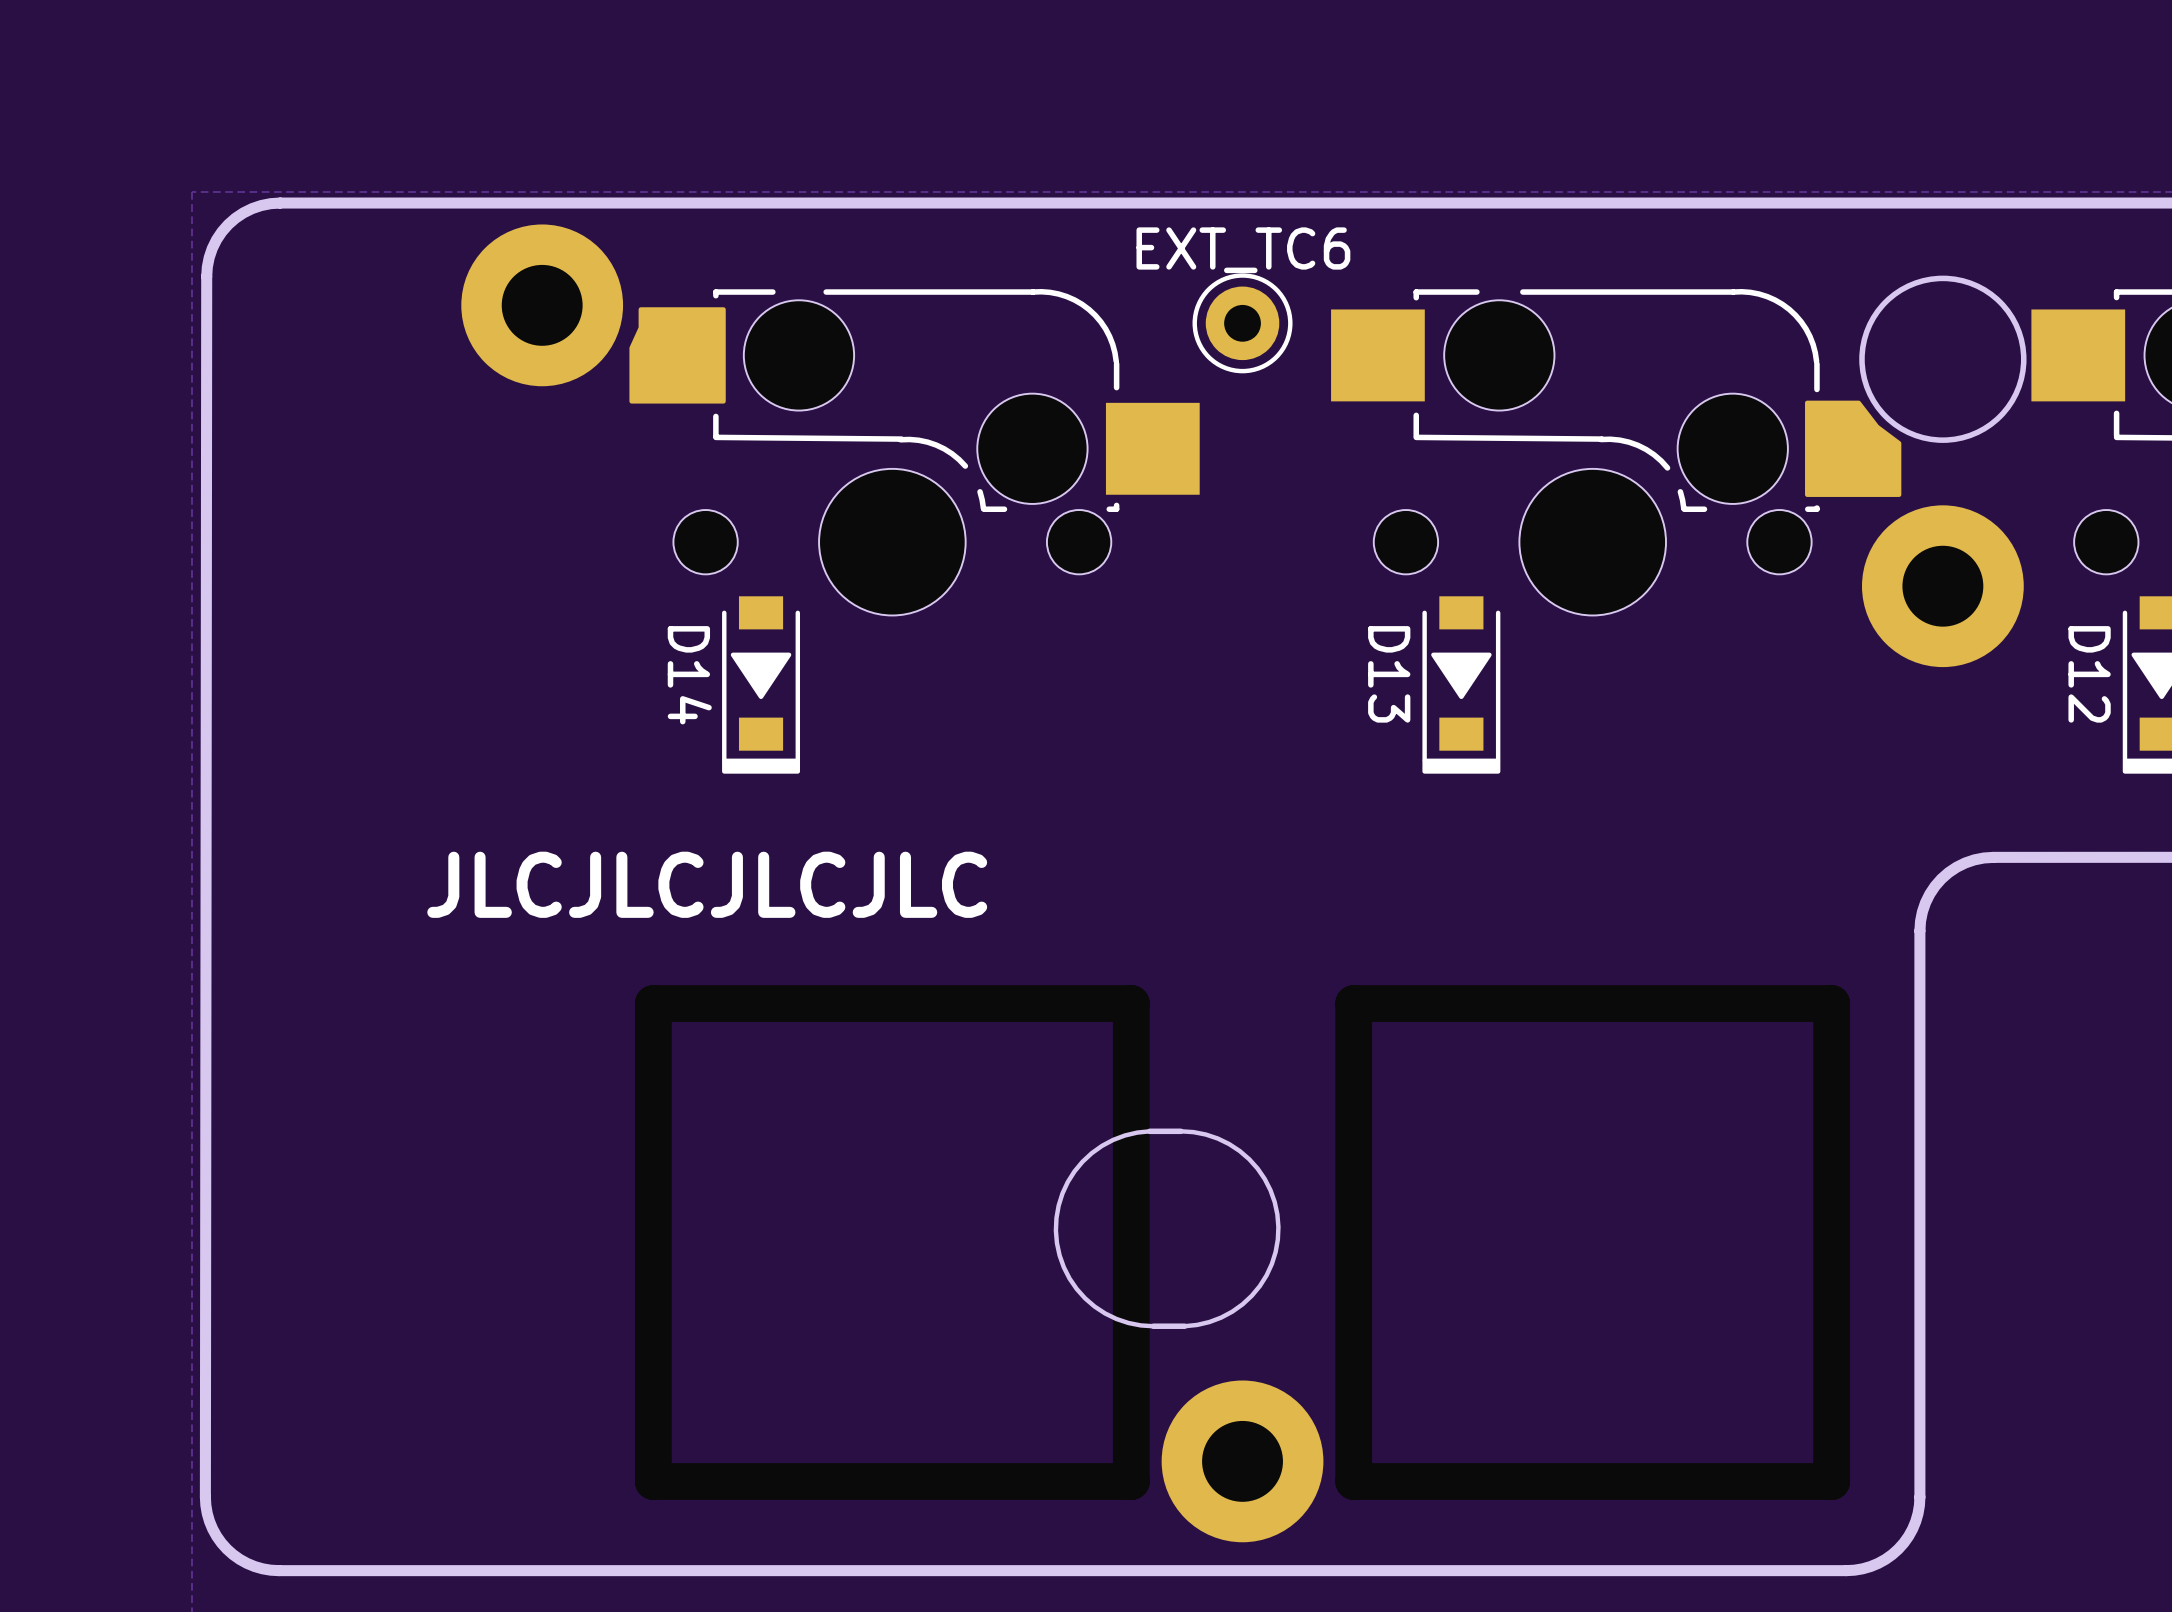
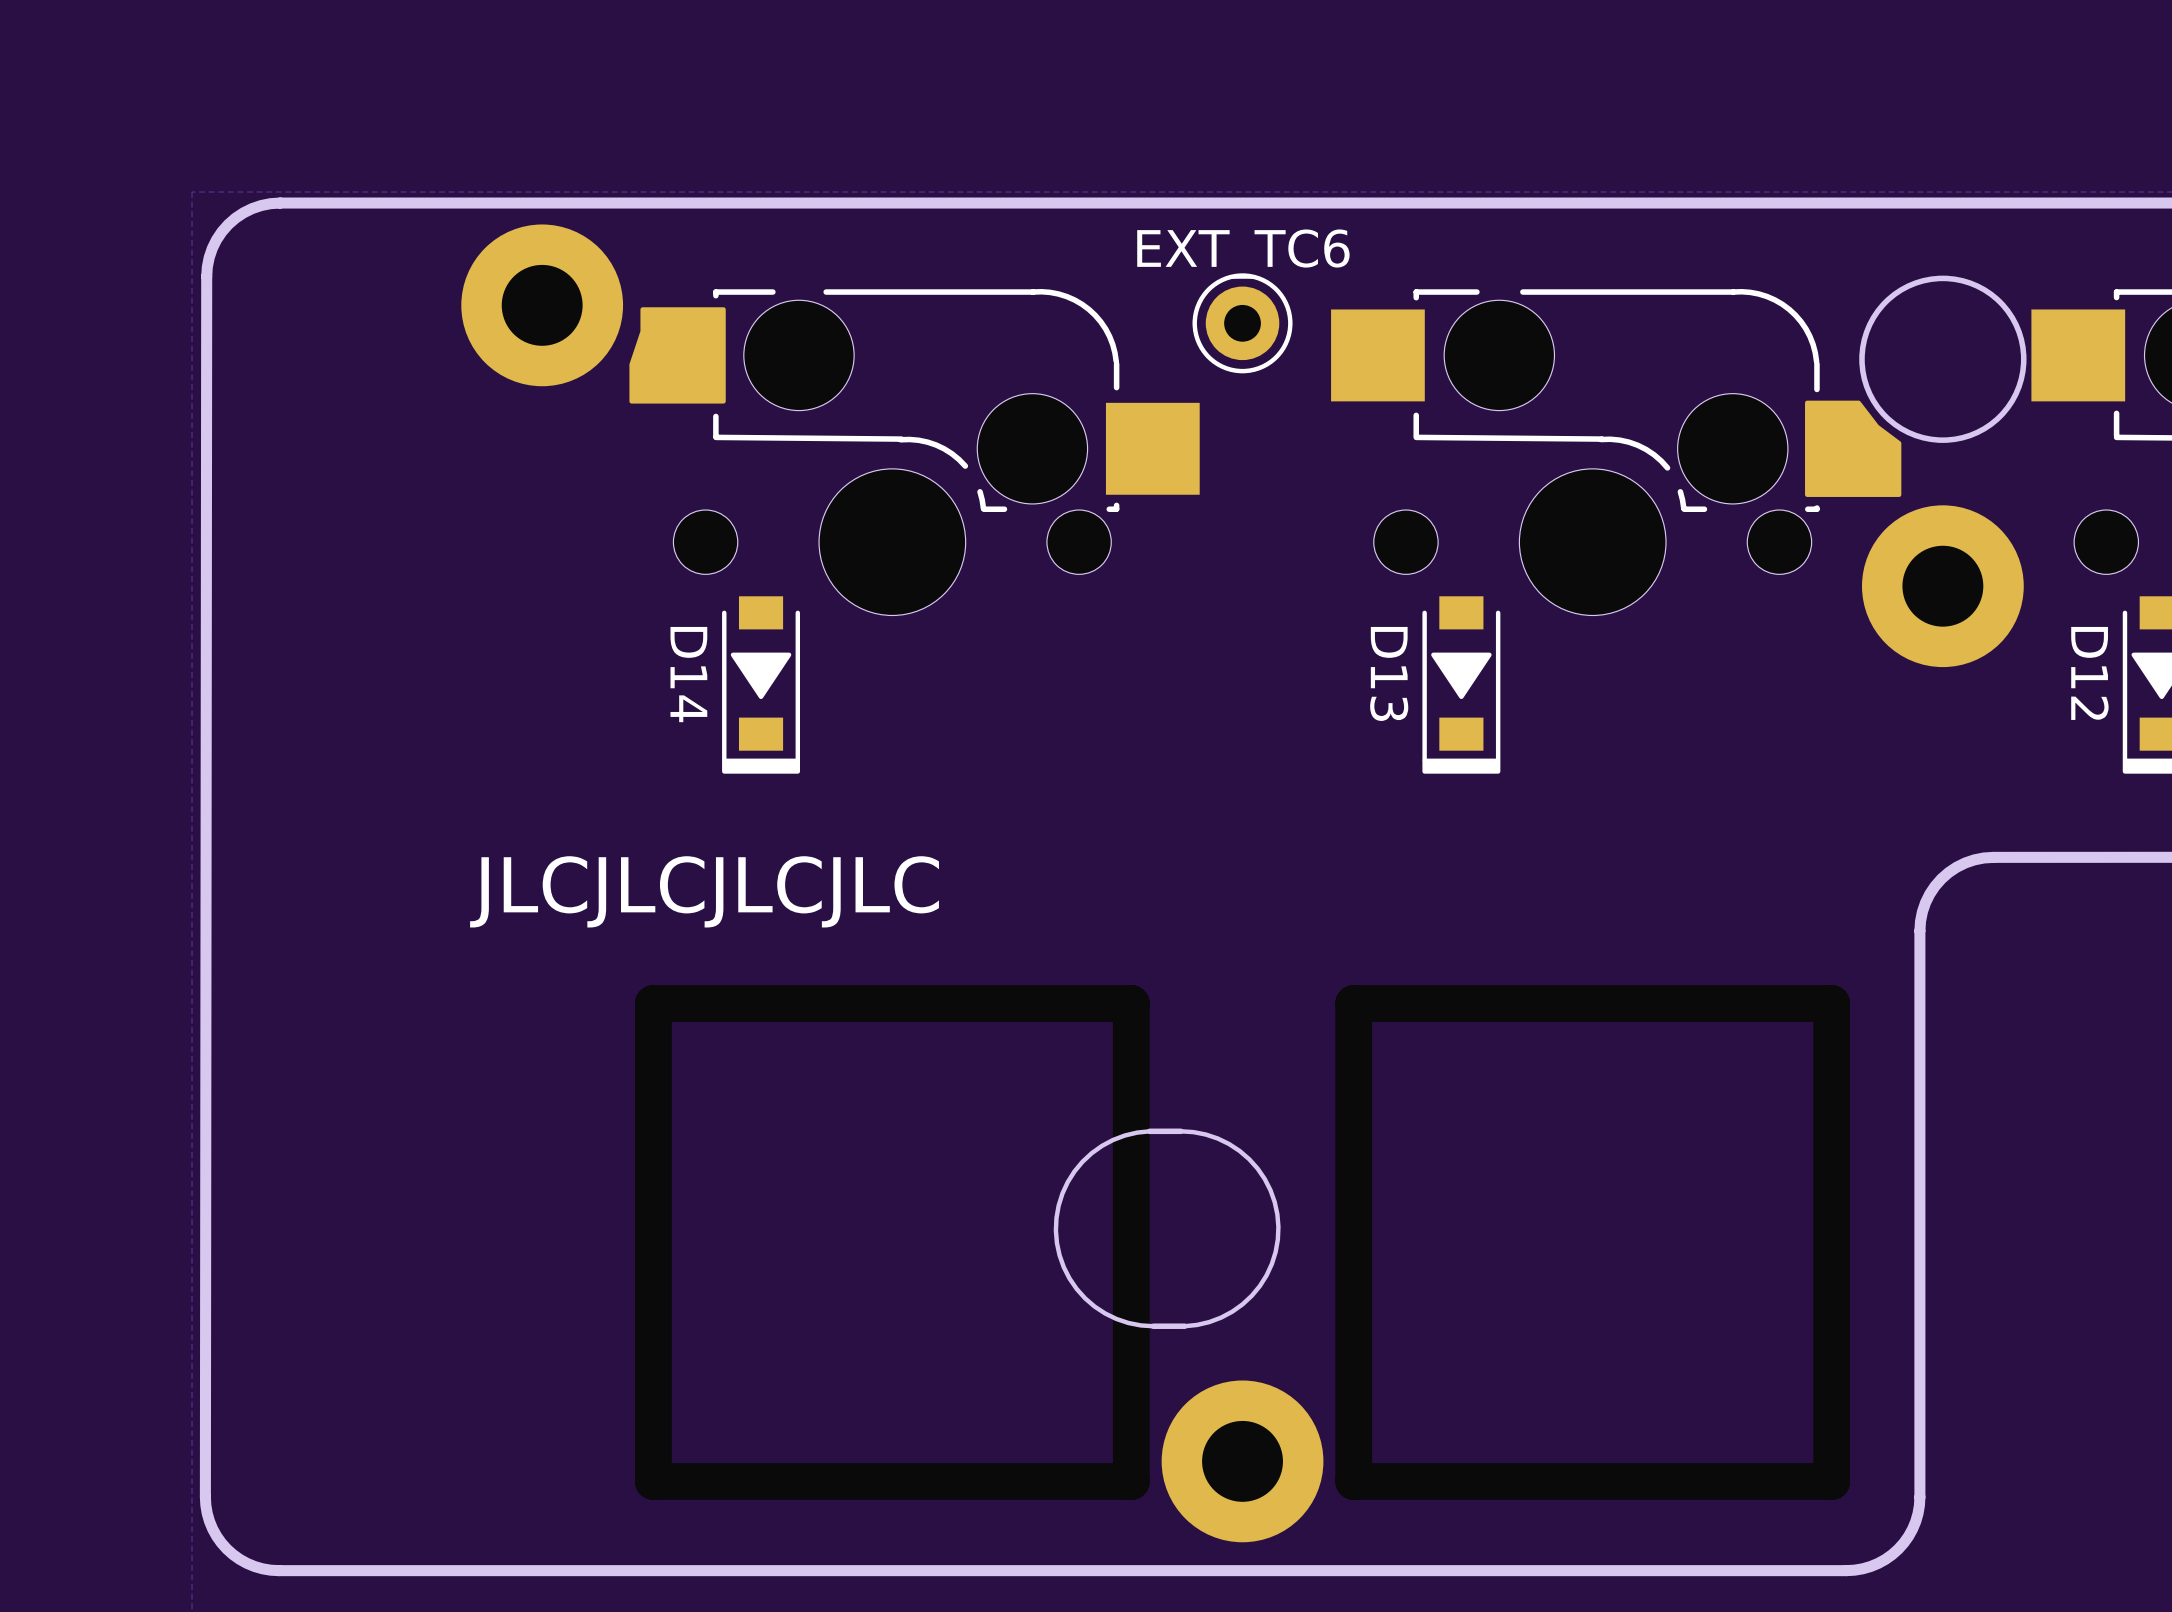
part footprint: [629, 288, 1200, 616] -> [629, 288, 1200, 616]

